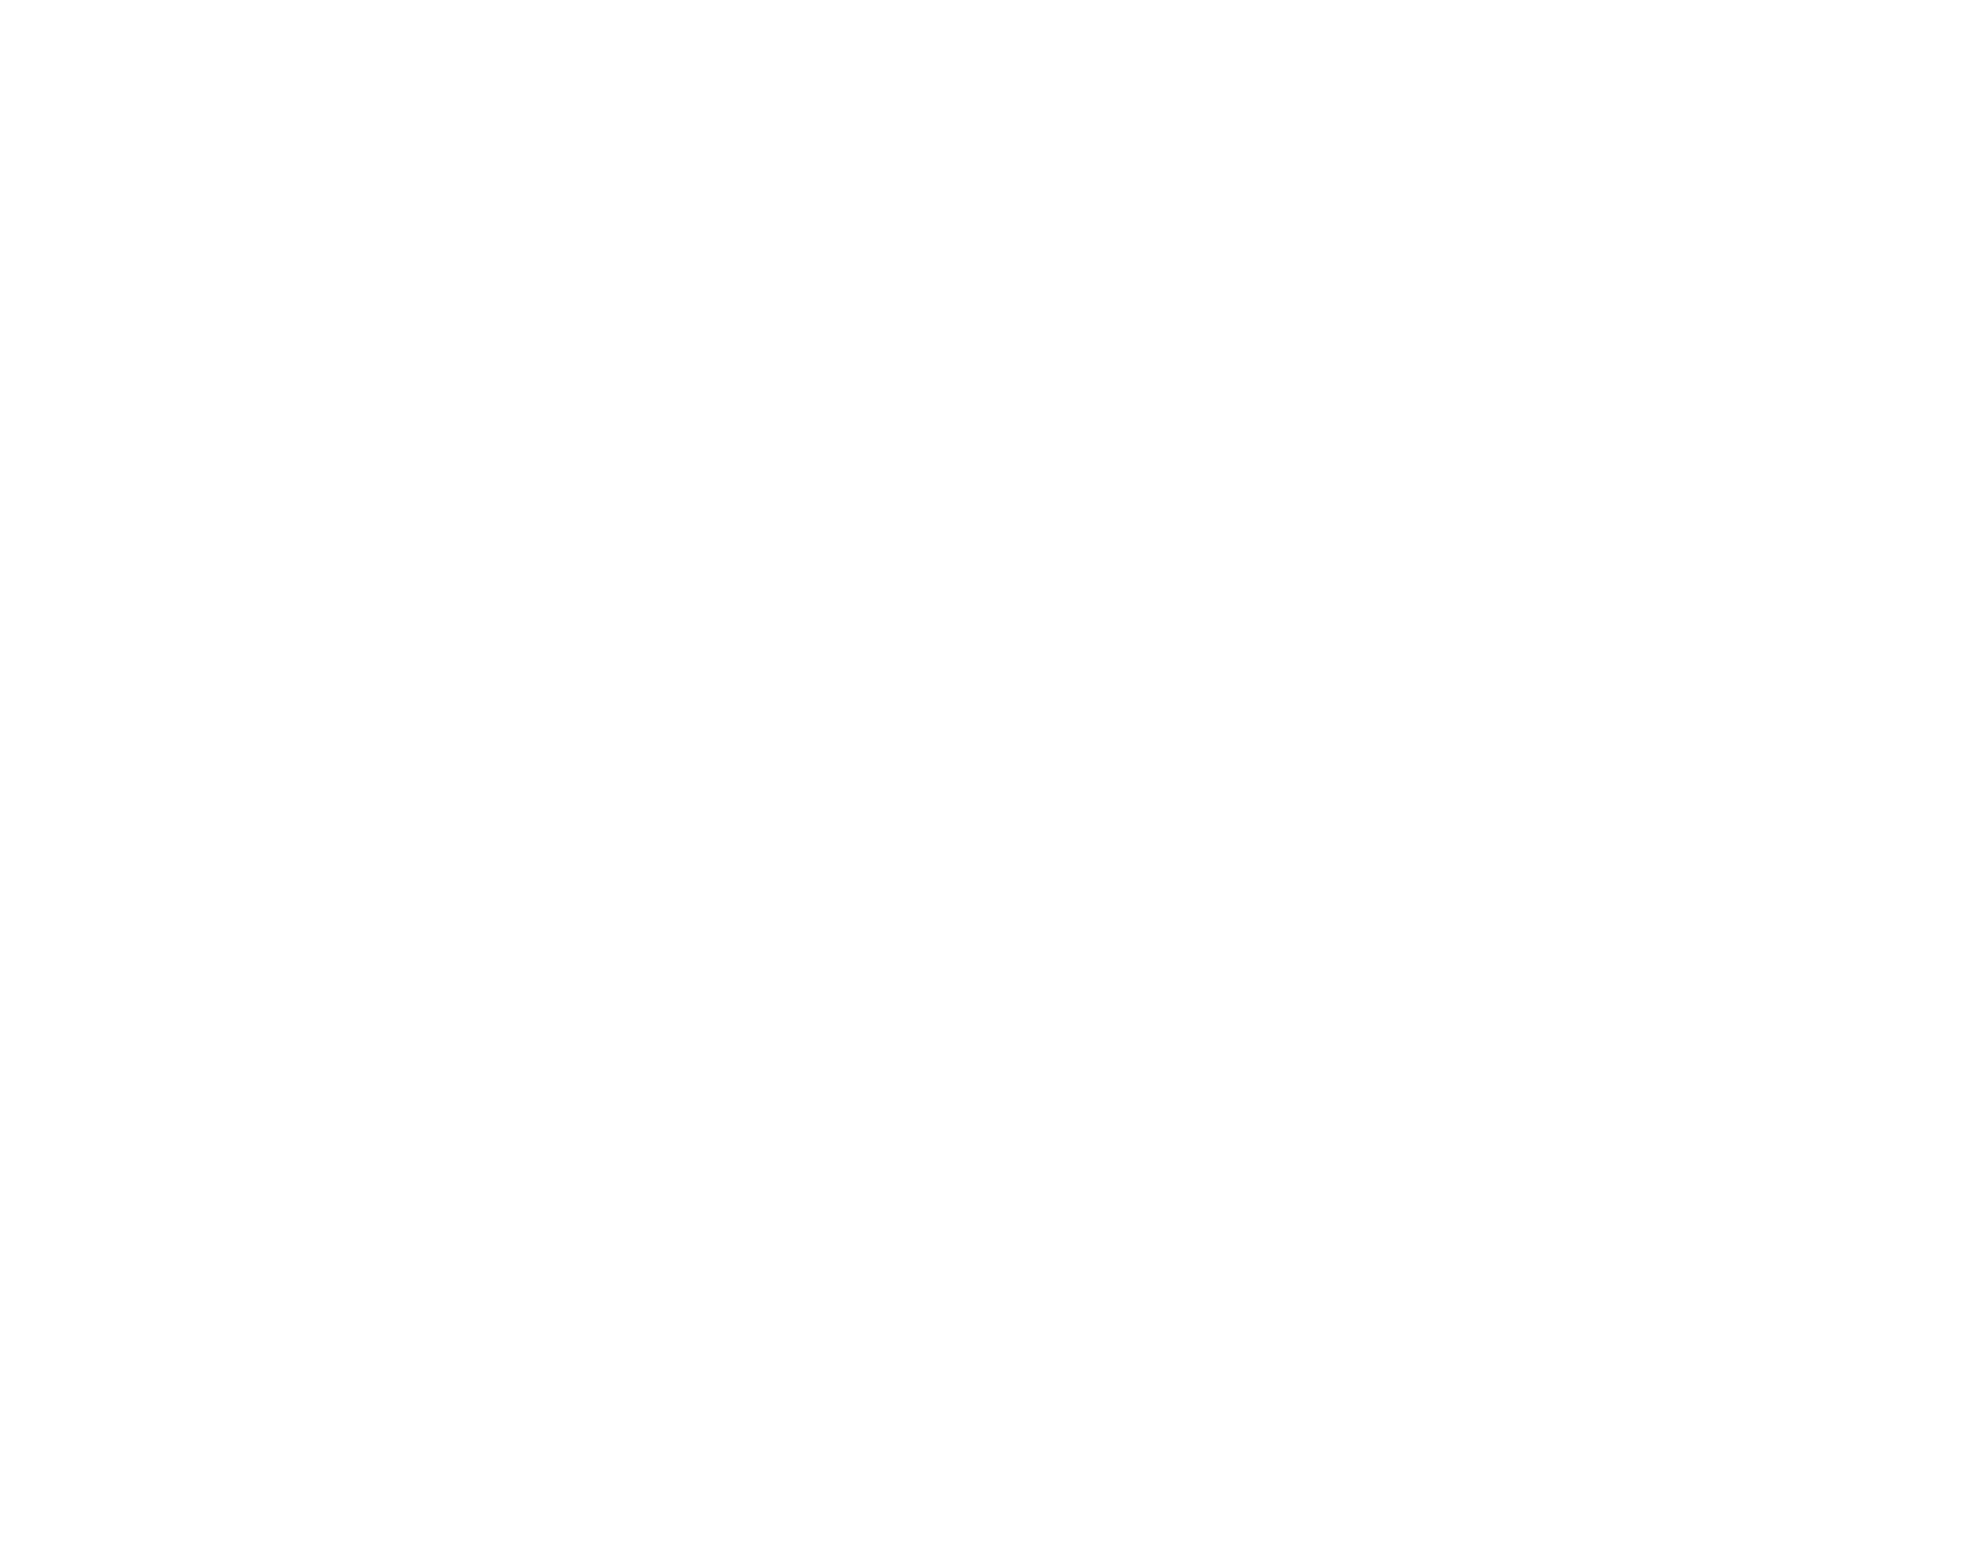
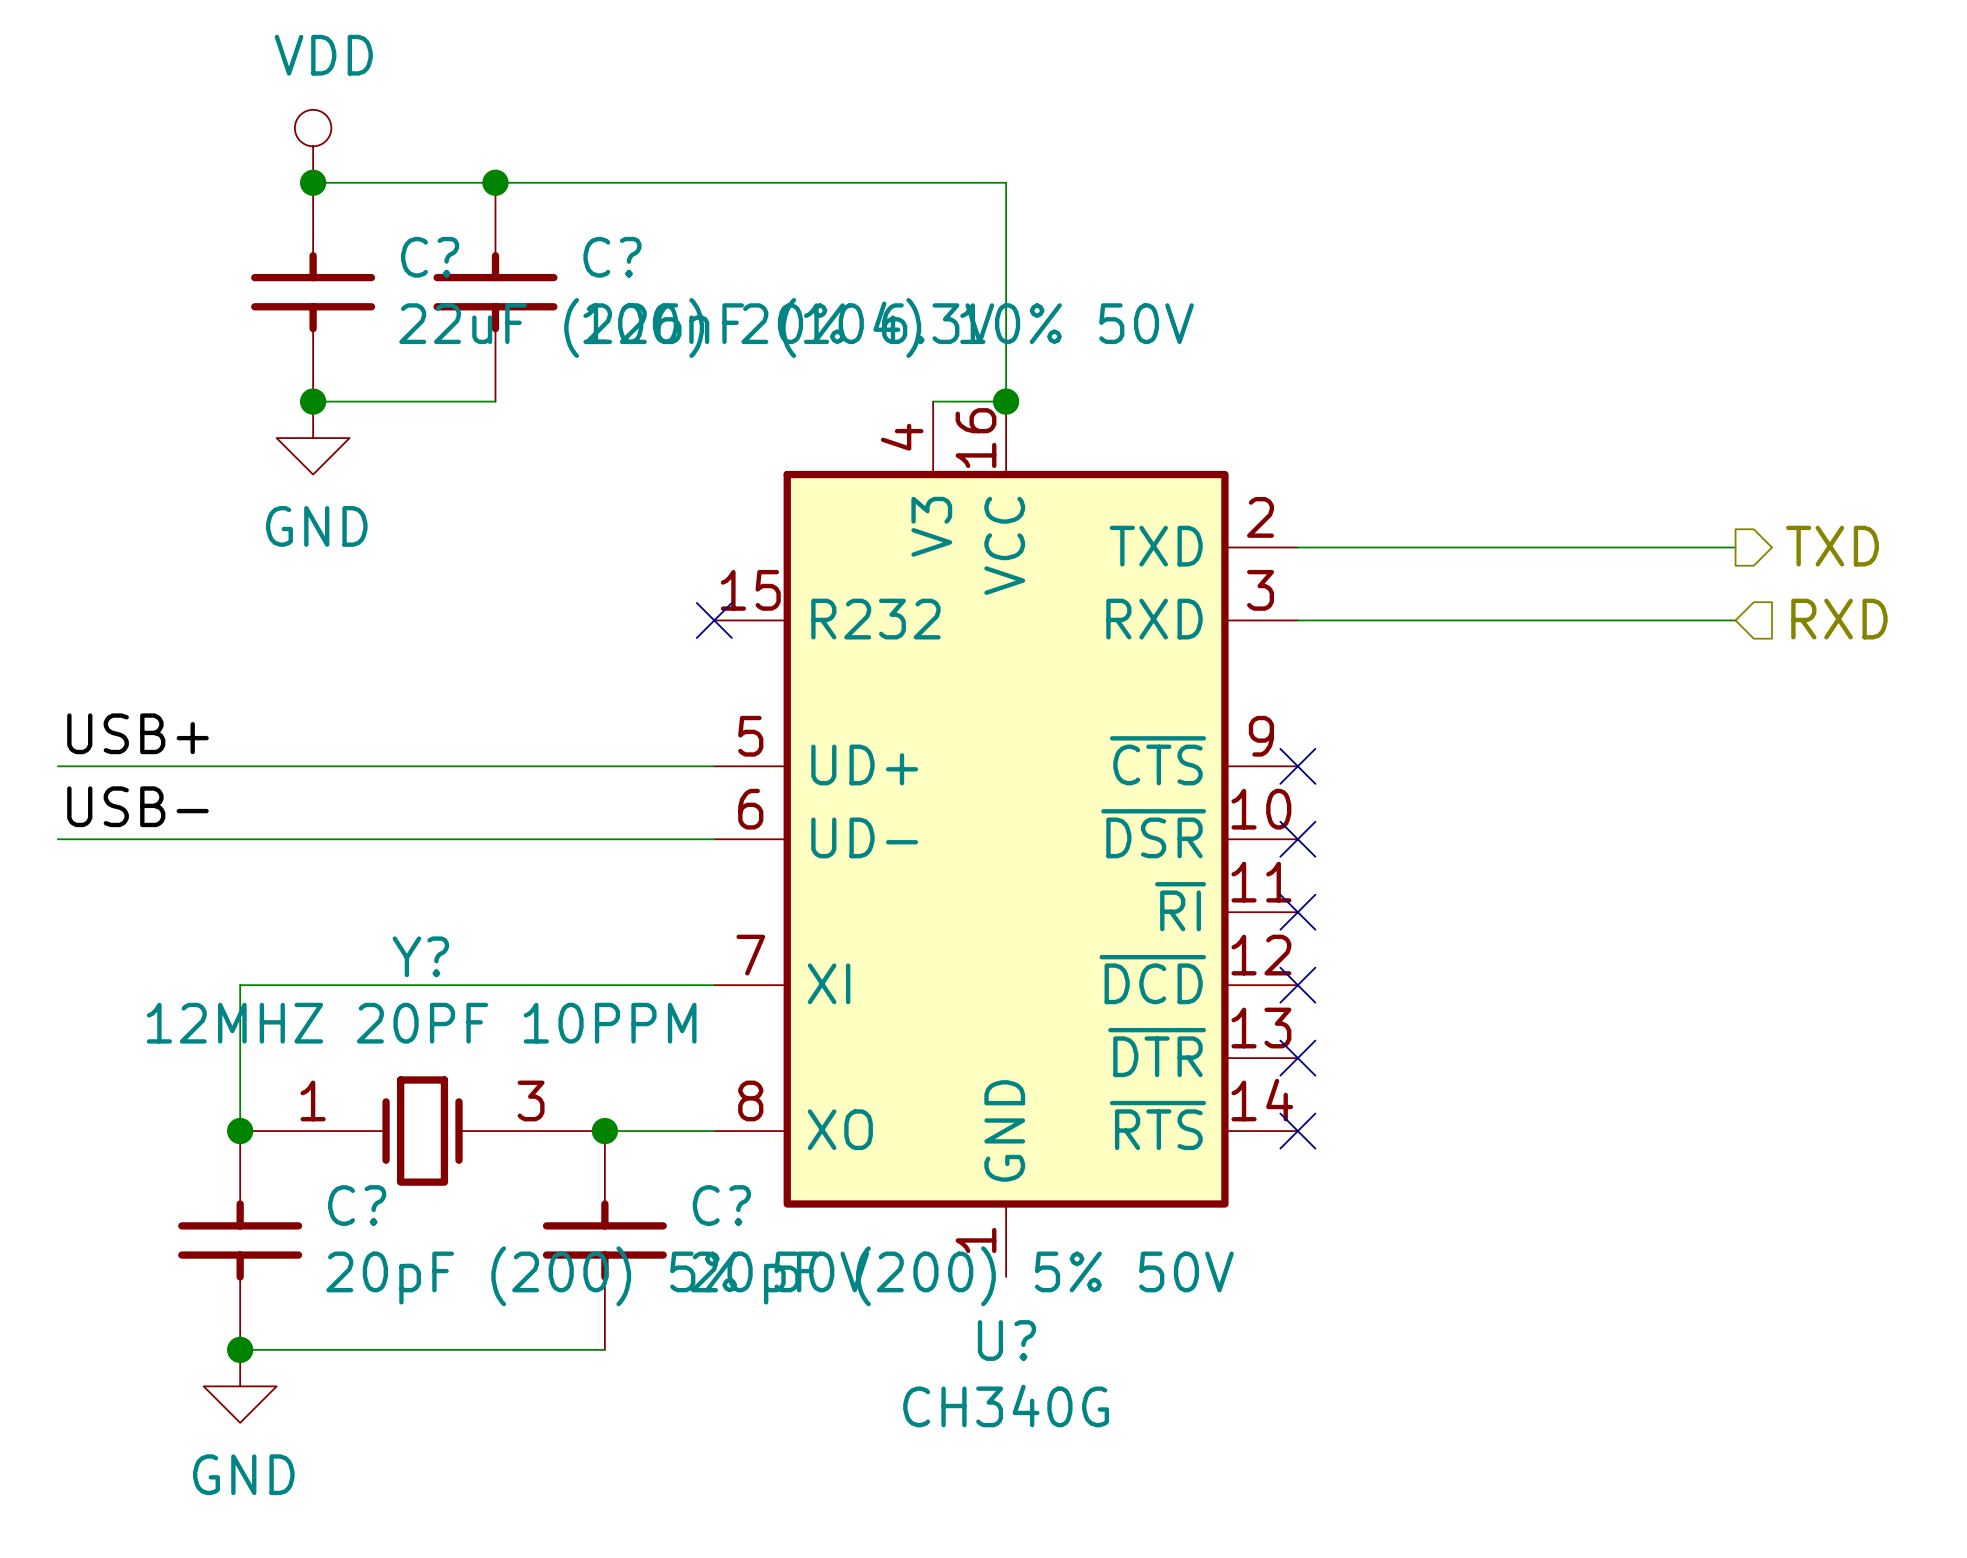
power symbol: none -> VDD (313, 146)
wire: none -> (313, 182) (1006, 182) (1006, 401) (933, 401)
junction: none -> (313, 182)
junction: none -> (495, 182)
C?: none -> (313, 292)
C?: none -> (495, 292)
wire: none -> (313, 401) (495, 401)
junction: none -> (313, 401)
junction: none -> (1006, 401)
power symbol: none -> GND (313, 438)
hierarchical label: none -> TXD (1832, 546)
wire: none -> (1297, 547) (1735, 547)
hierarchical label: none -> RXD (1839, 619)
no-connect mark: none -> (714, 620)
wire: none -> (1297, 620) (1735, 620)
label: none -> USB+ (137, 733)
wire: none -> (57, 766) (714, 766)
no-connect mark: none -> (1297, 766)
label: none -> USB- (137, 806)
wire: none -> (57, 839) (714, 839)
U?: none -> CH340G (1006, 839)
no-connect mark: none -> (1297, 839)
no-connect mark: none -> (1297, 912)
wire: none -> (714, 985) (240, 985) (240, 1131)
no-connect mark: none -> (1297, 985)
no-connect mark: none -> (1297, 1058)
junction: none -> (240, 1131)
Y?: none -> (422, 1131)
wire: none -> (604, 1131) (714, 1131)
junction: none -> (604, 1131)
no-connect mark: none -> (1297, 1131)
C?: none -> (240, 1240)
C?: none -> (604, 1240)
wire: none -> (240, 1349) (604, 1349)
junction: none -> (240, 1349)
power symbol: none -> GND (240, 1386)

